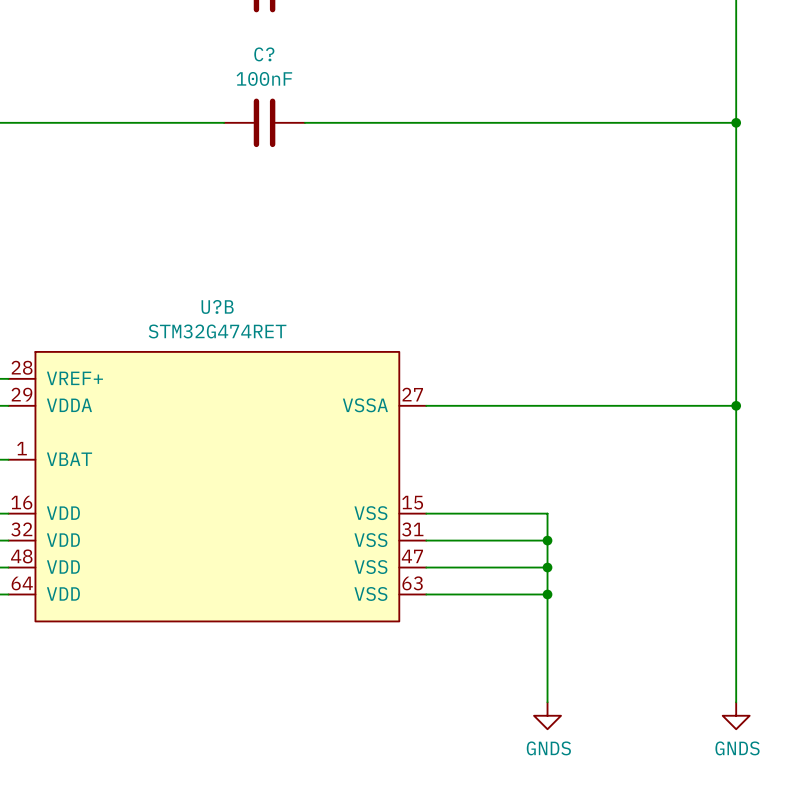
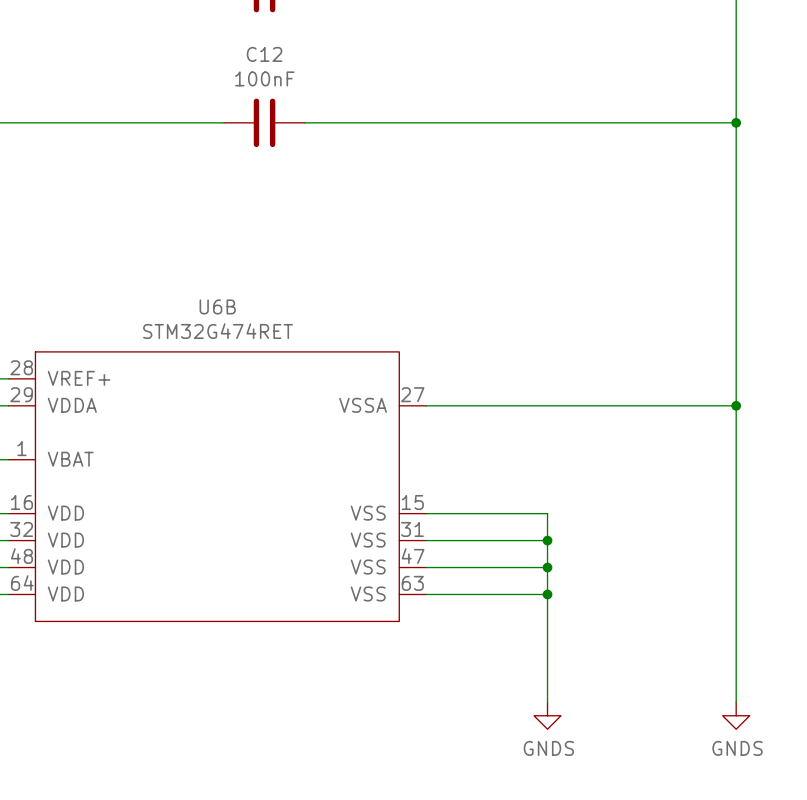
C? name: C? (264, 54) -> C12 (264, 54)
U?B name: U?B (217, 306) -> U6B (217, 306)

